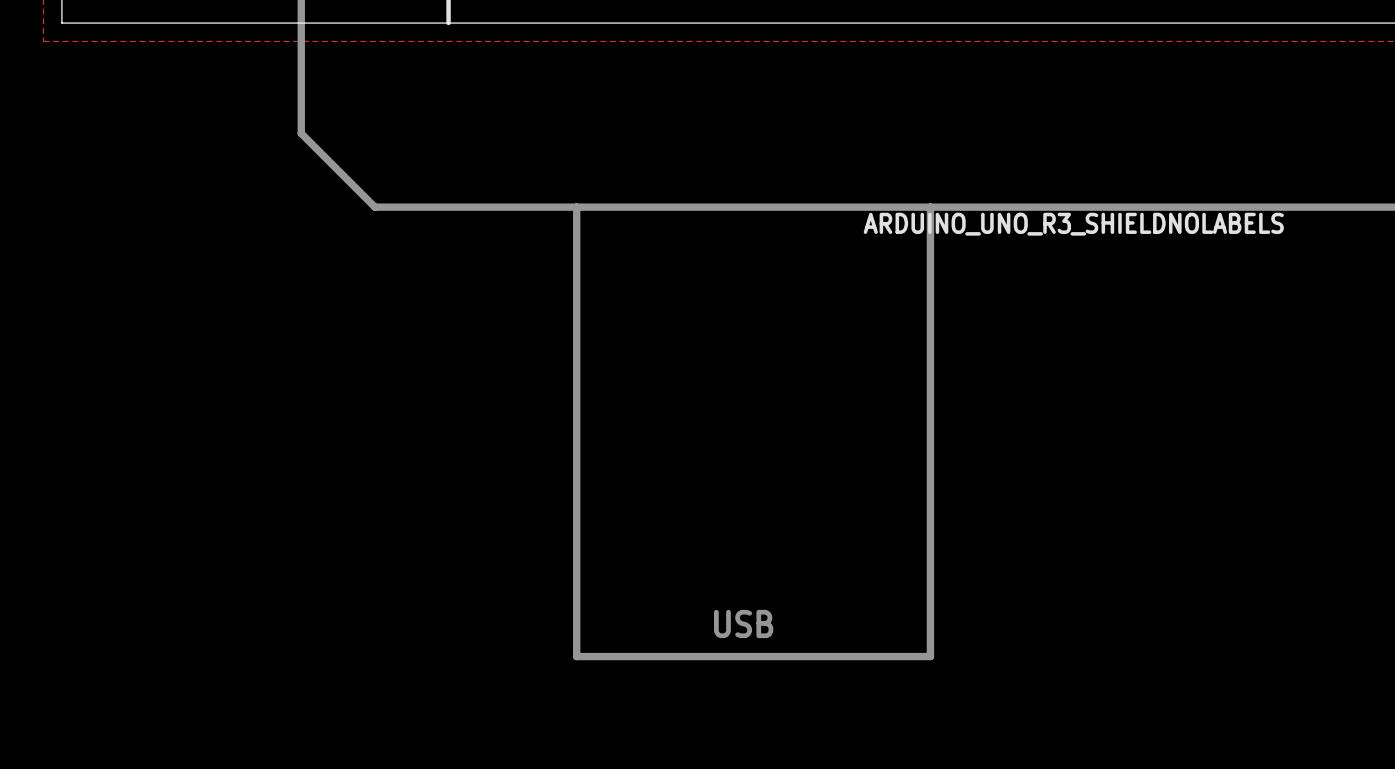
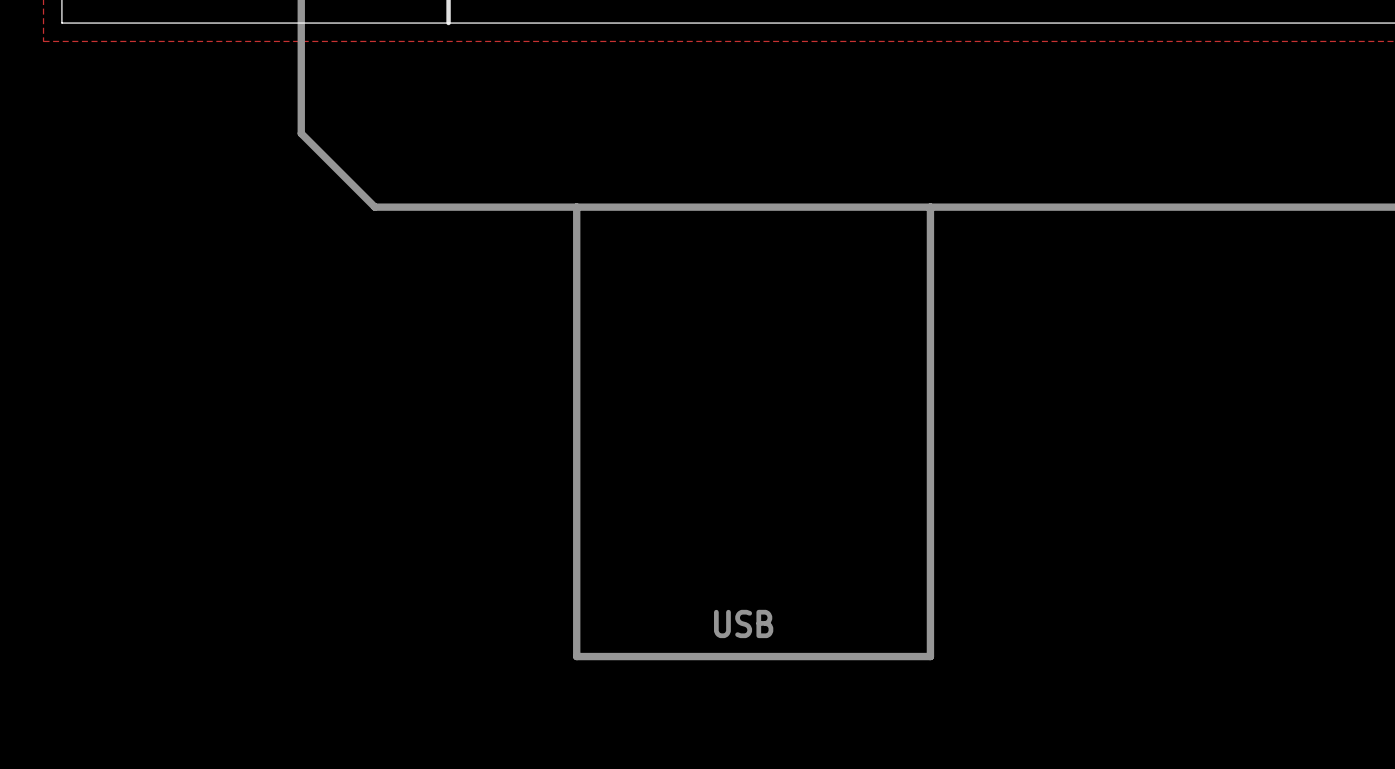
part value: ARDUINO_UNO_R3_SHIELDNOLABELS (1073, 224) -> none

